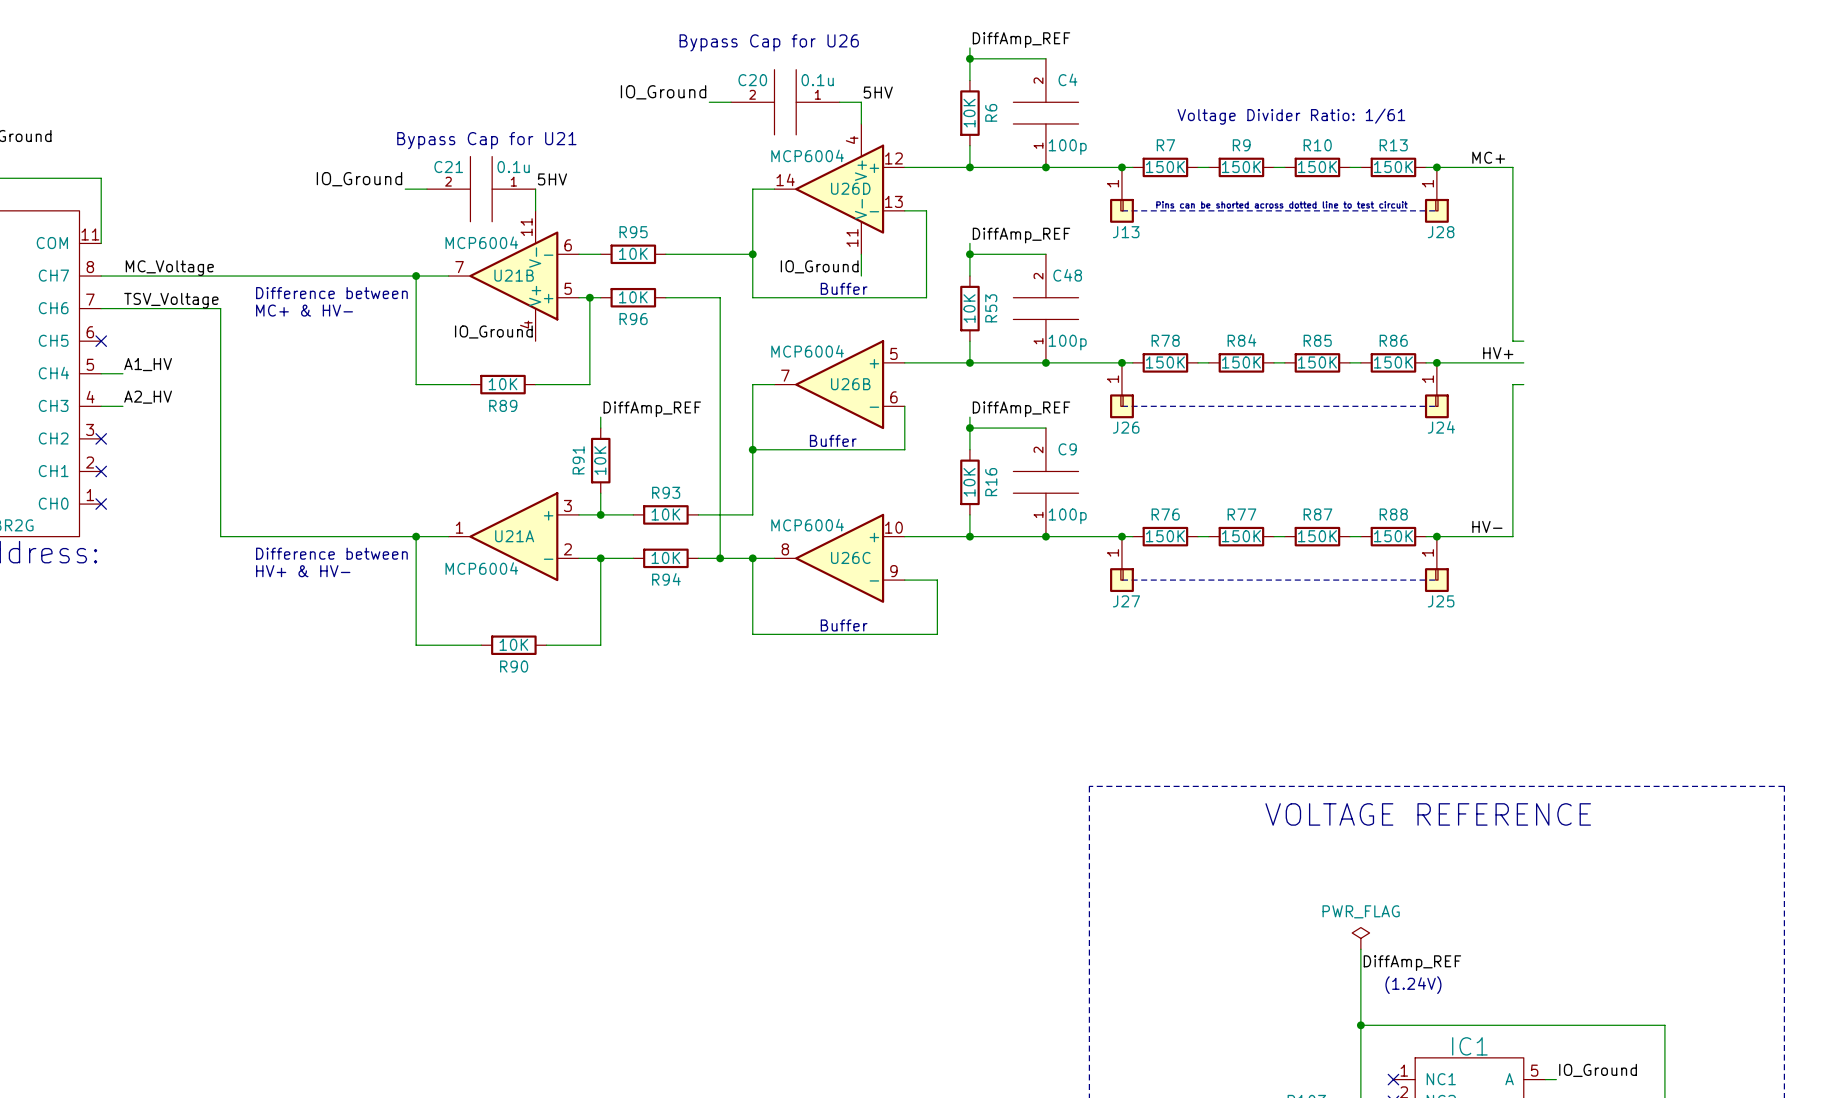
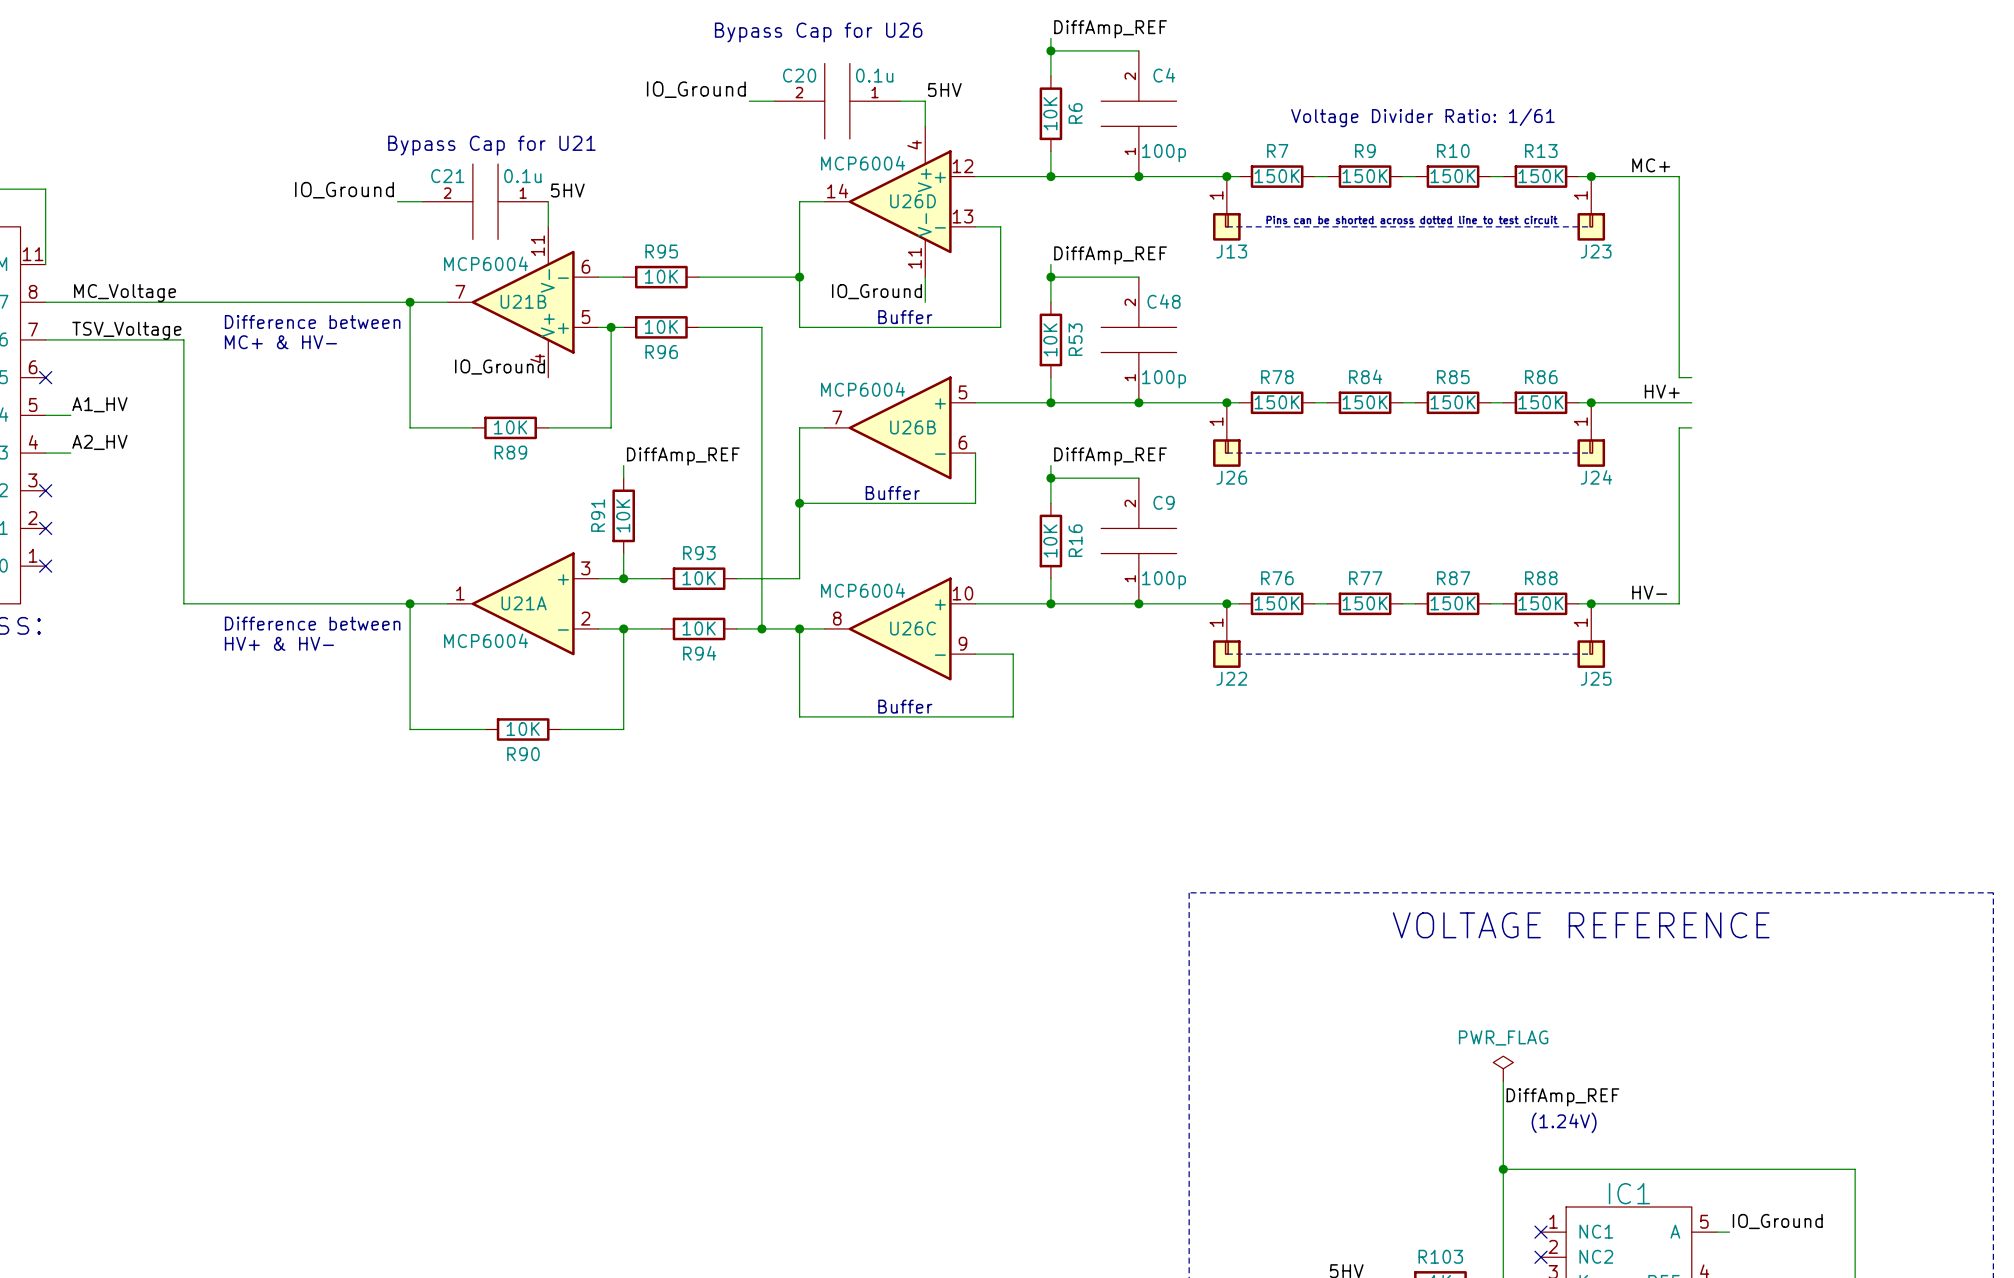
J28 name: J28 (1441, 232) -> J23 (1596, 251)
J27 name: J27 (1126, 601) -> J22 (1231, 678)

